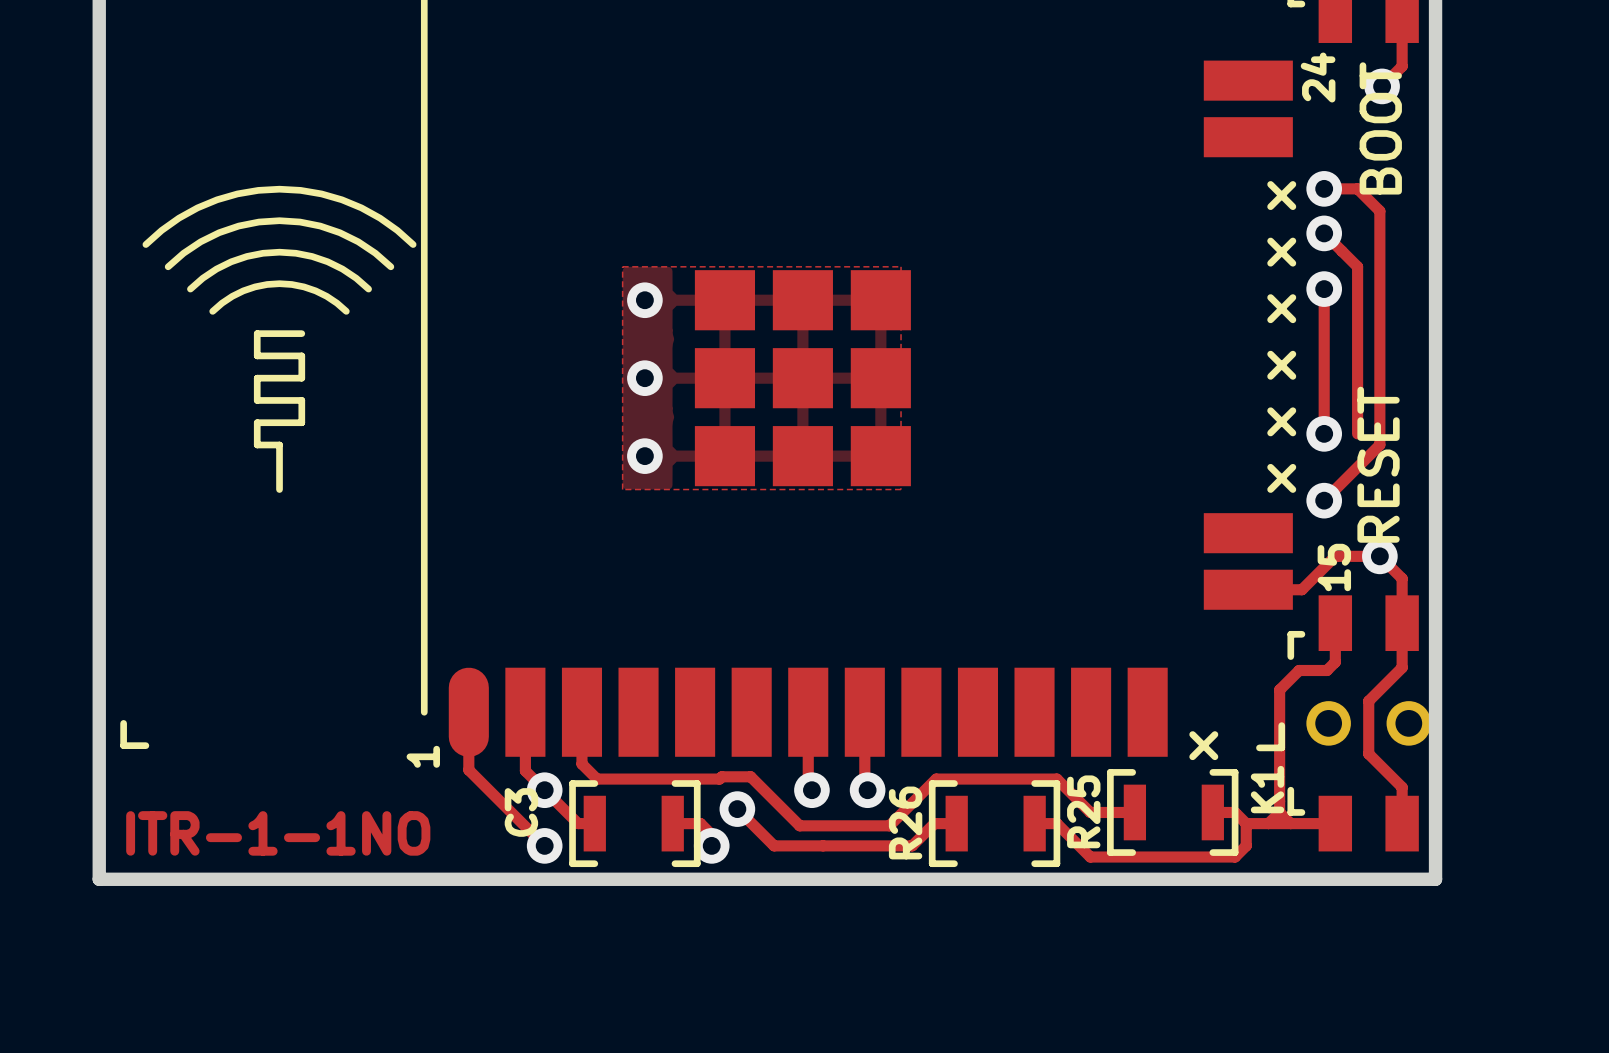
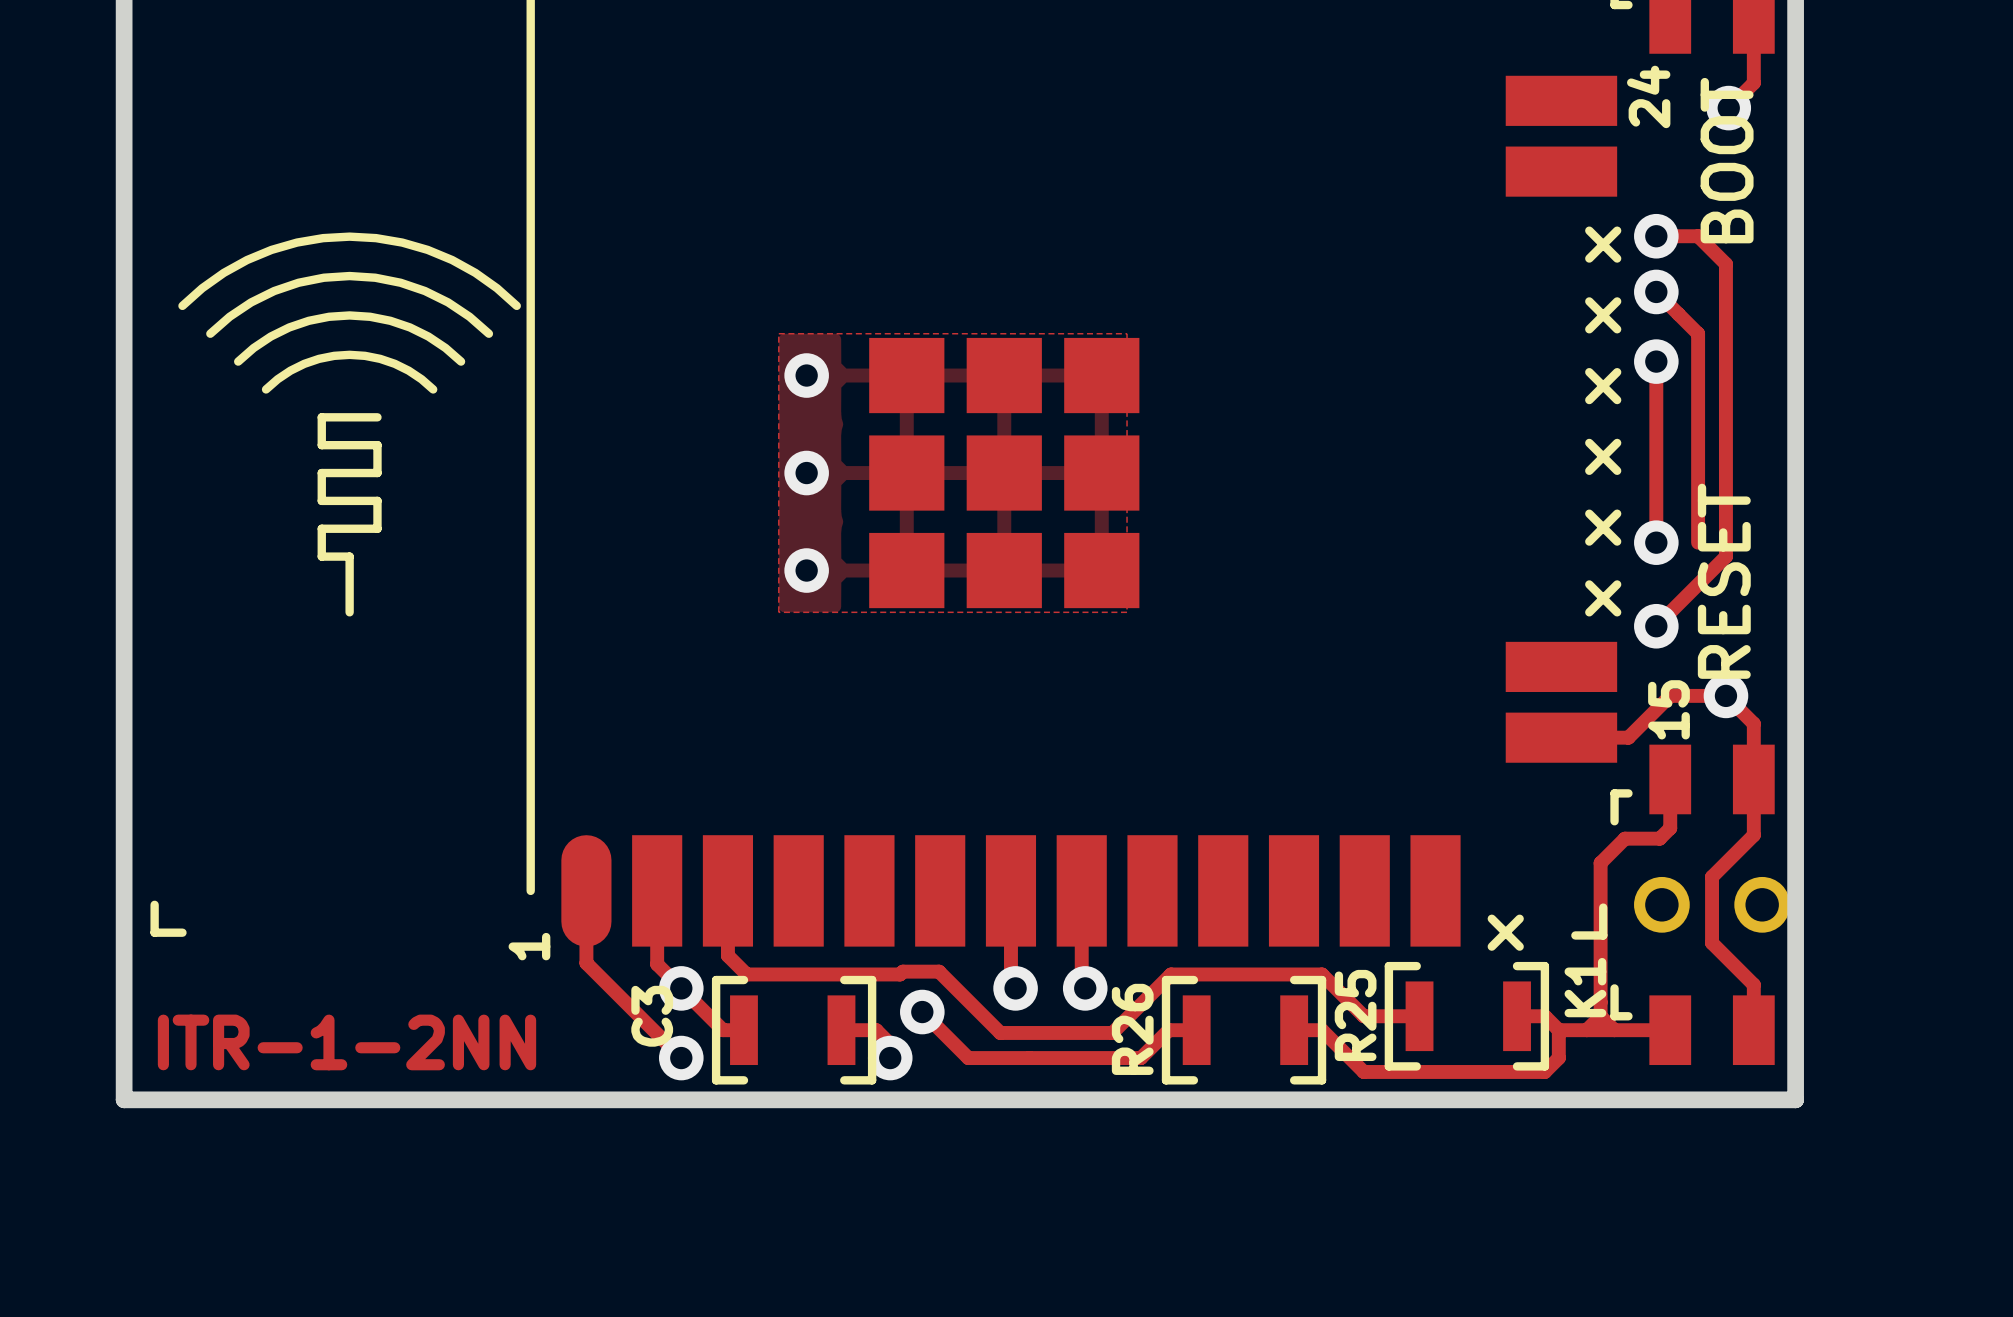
text: ITR-1-1NO (278, 833) -> ITR-1-2NN (347, 1042)

